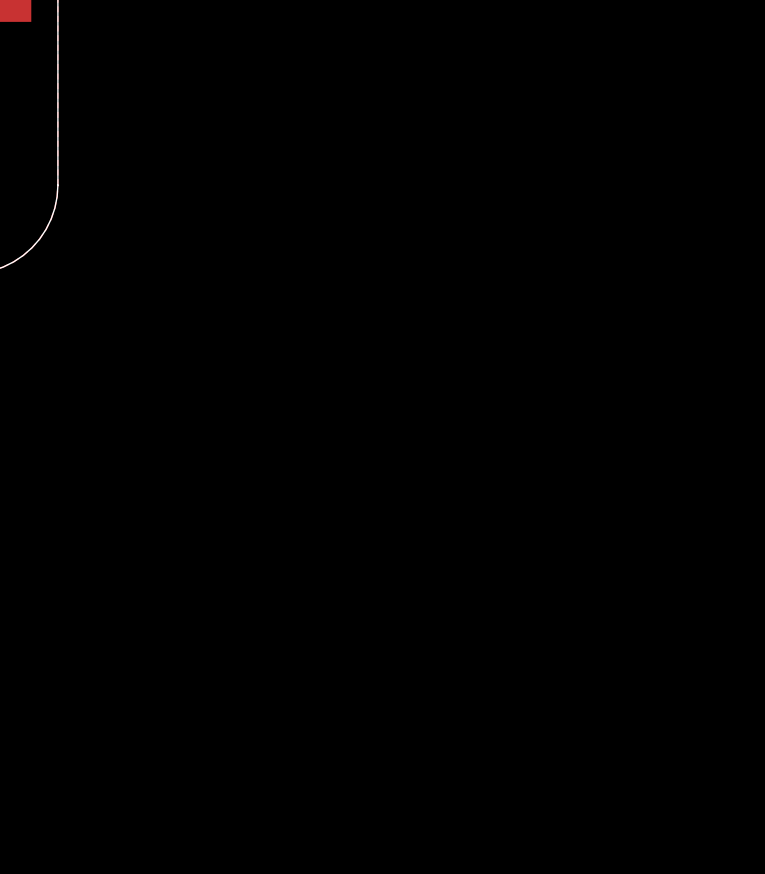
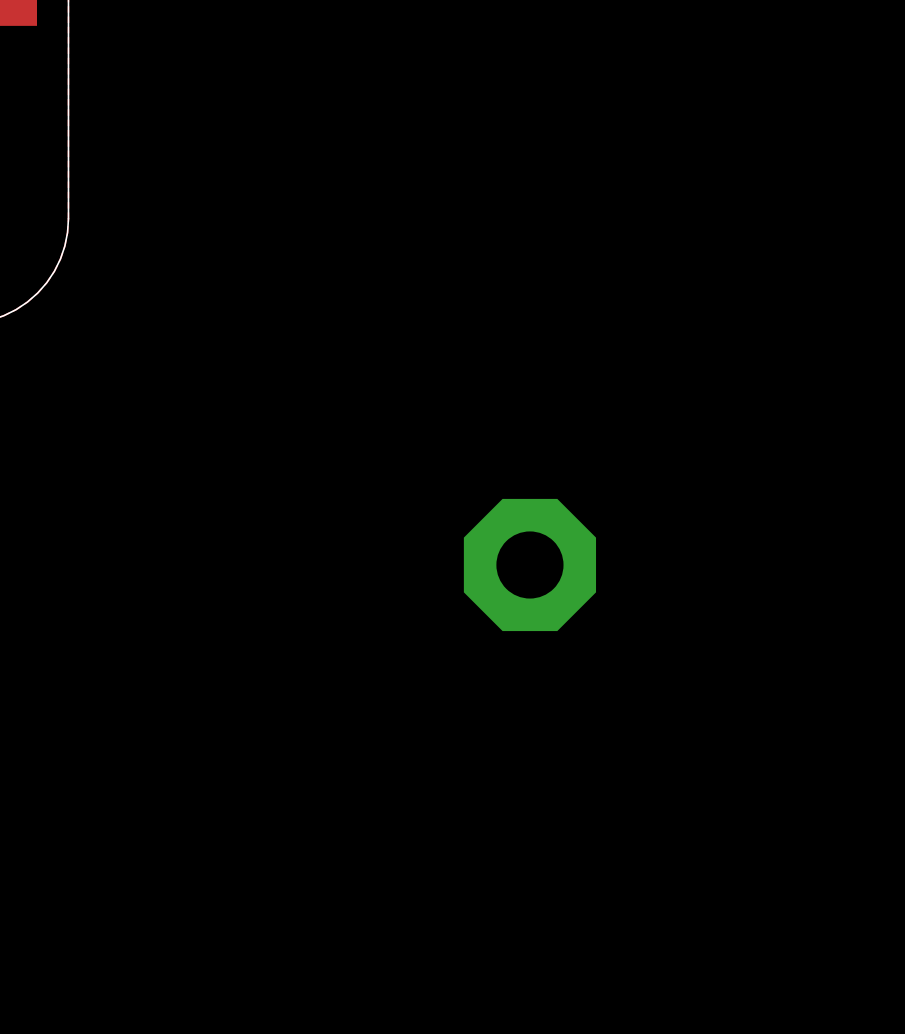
part: none -> (529, 564)

